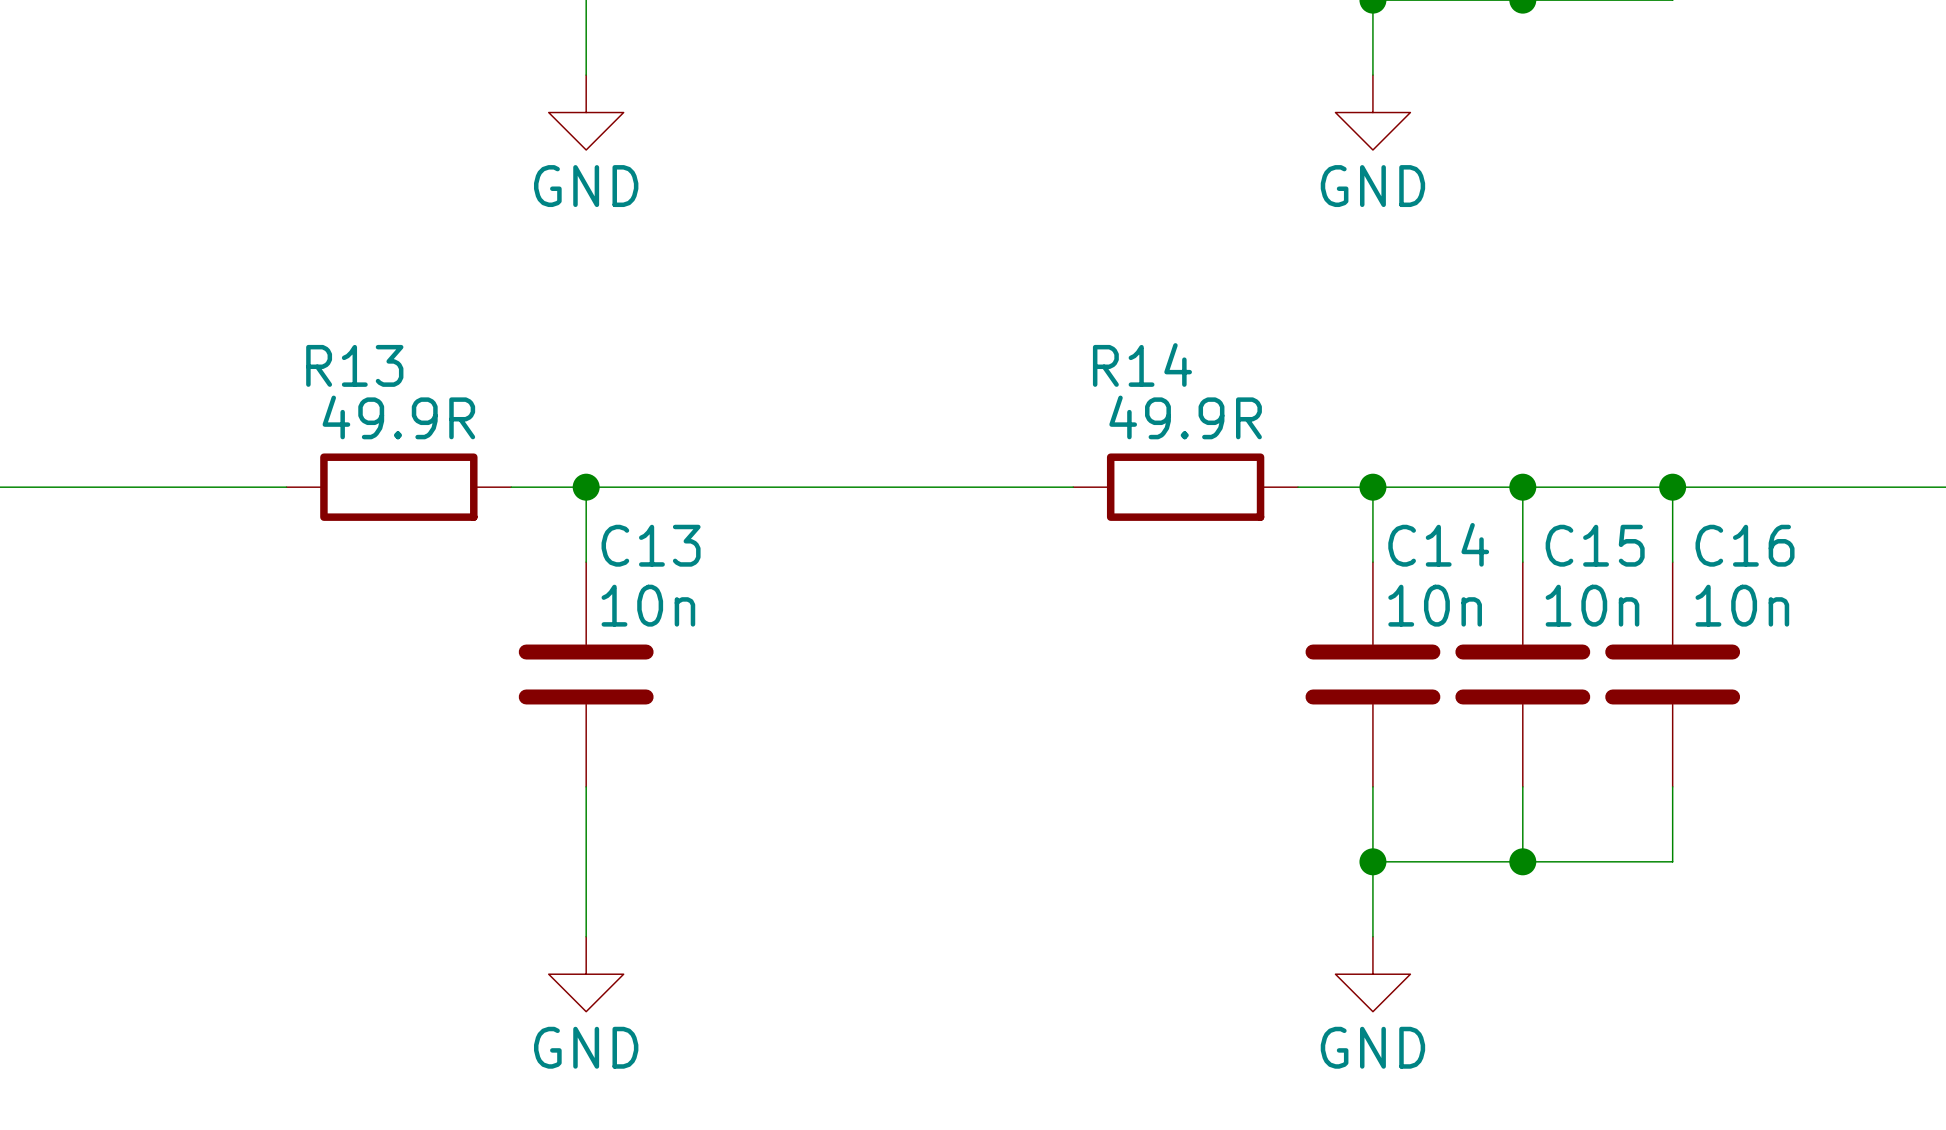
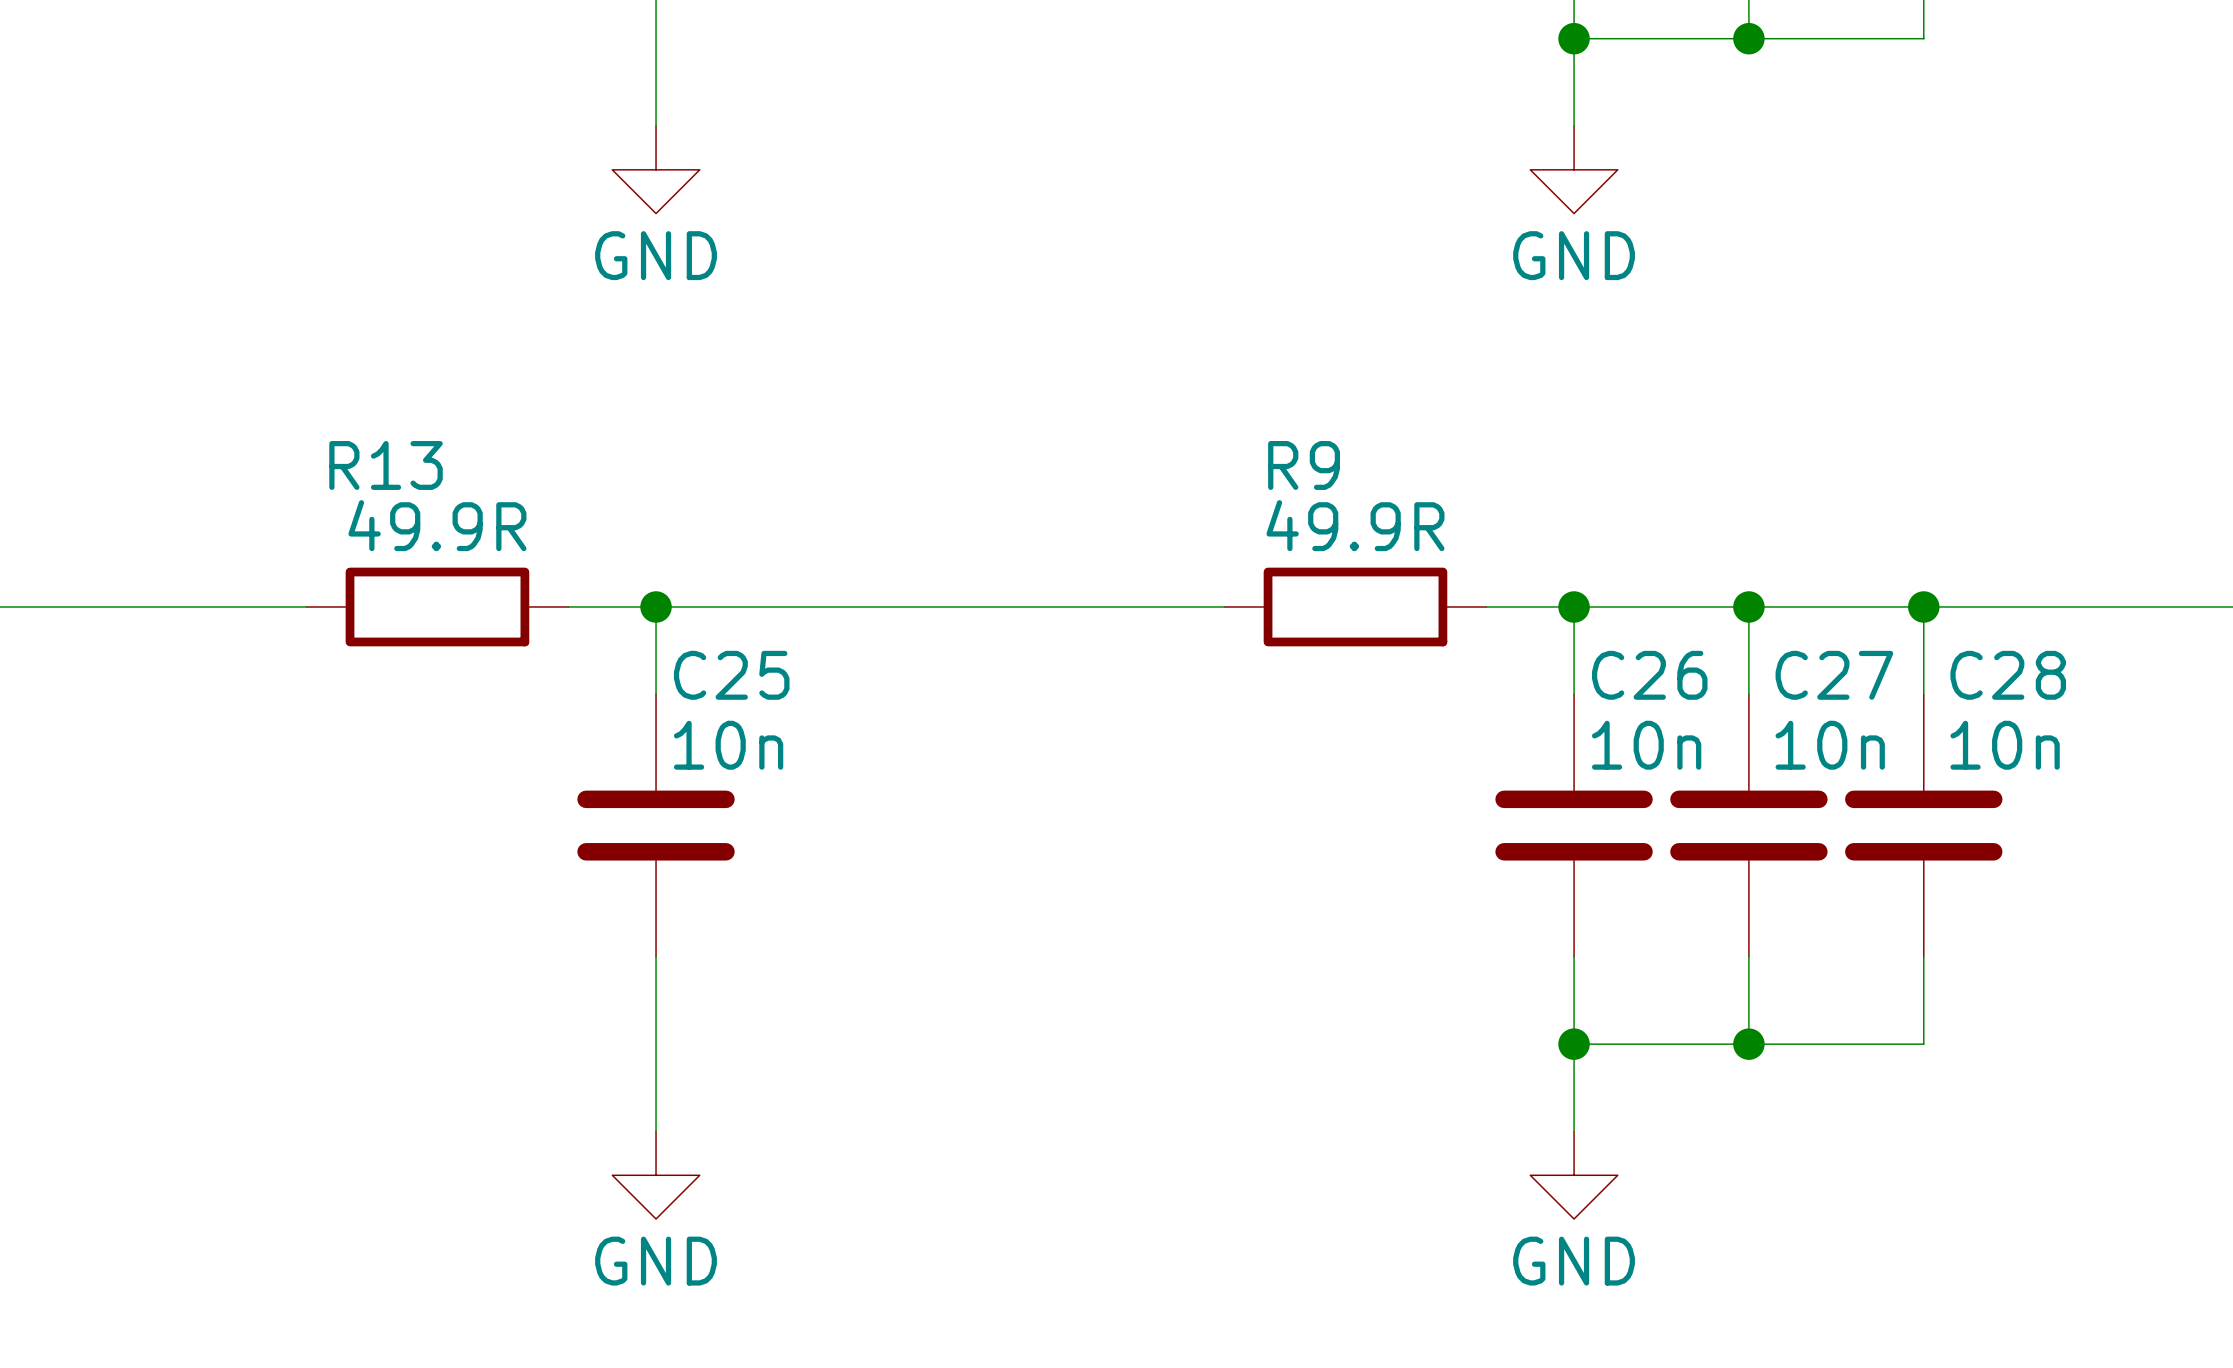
R14 name: R14 (1142, 365) -> R9 (1304, 465)
C14 name: C14 (1438, 544) -> C26 (1649, 675)
C13 name: C13 (651, 545) -> C25 (731, 675)
C15 name: C15 (1595, 545) -> C27 (1834, 675)
C16 name: C16 (1745, 545) -> C28 (2008, 675)

